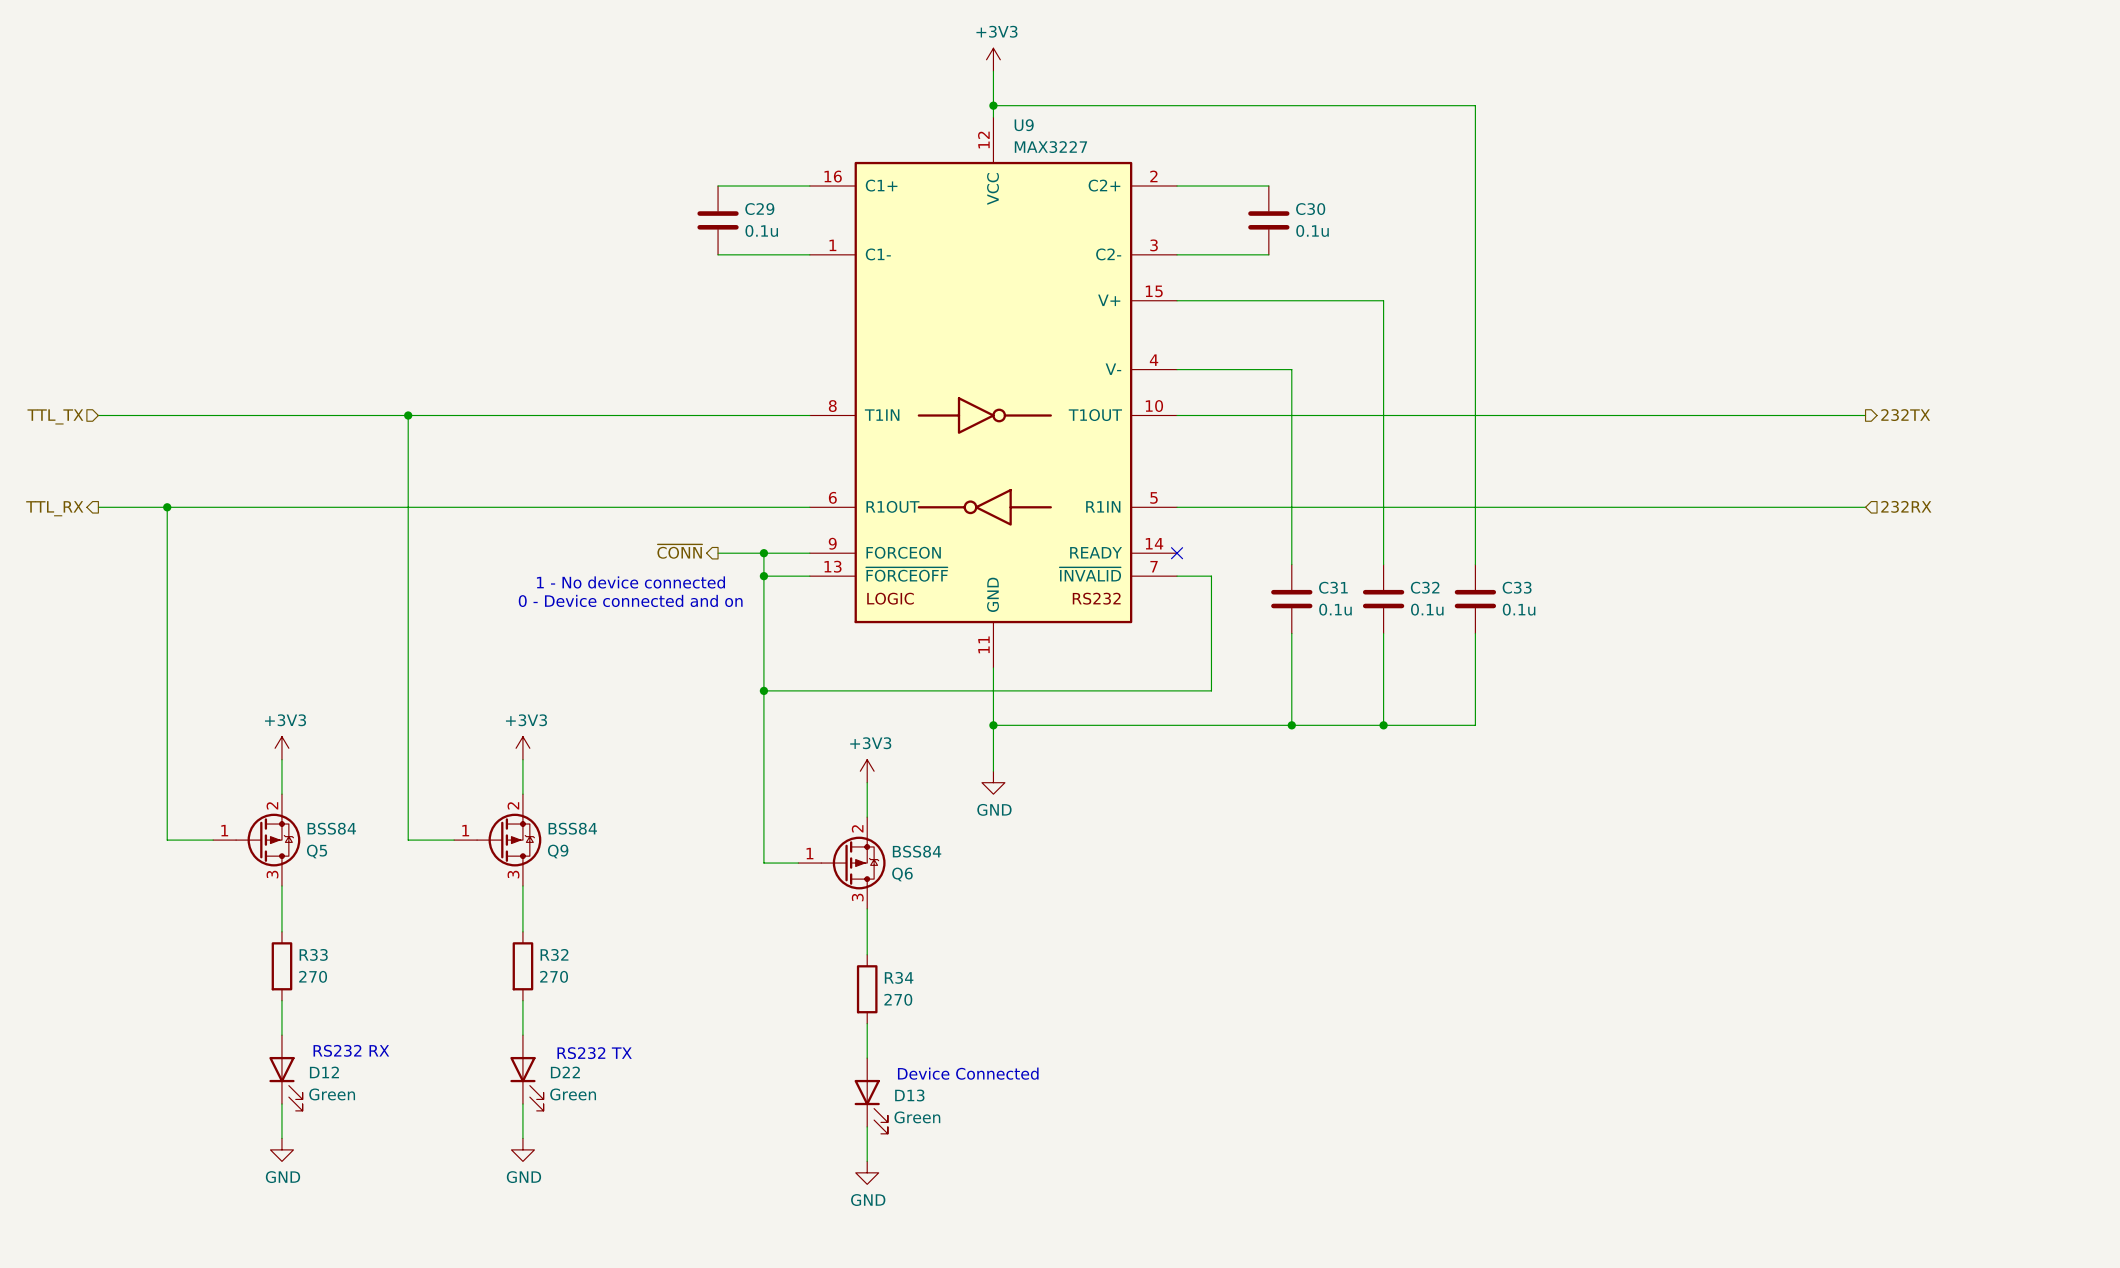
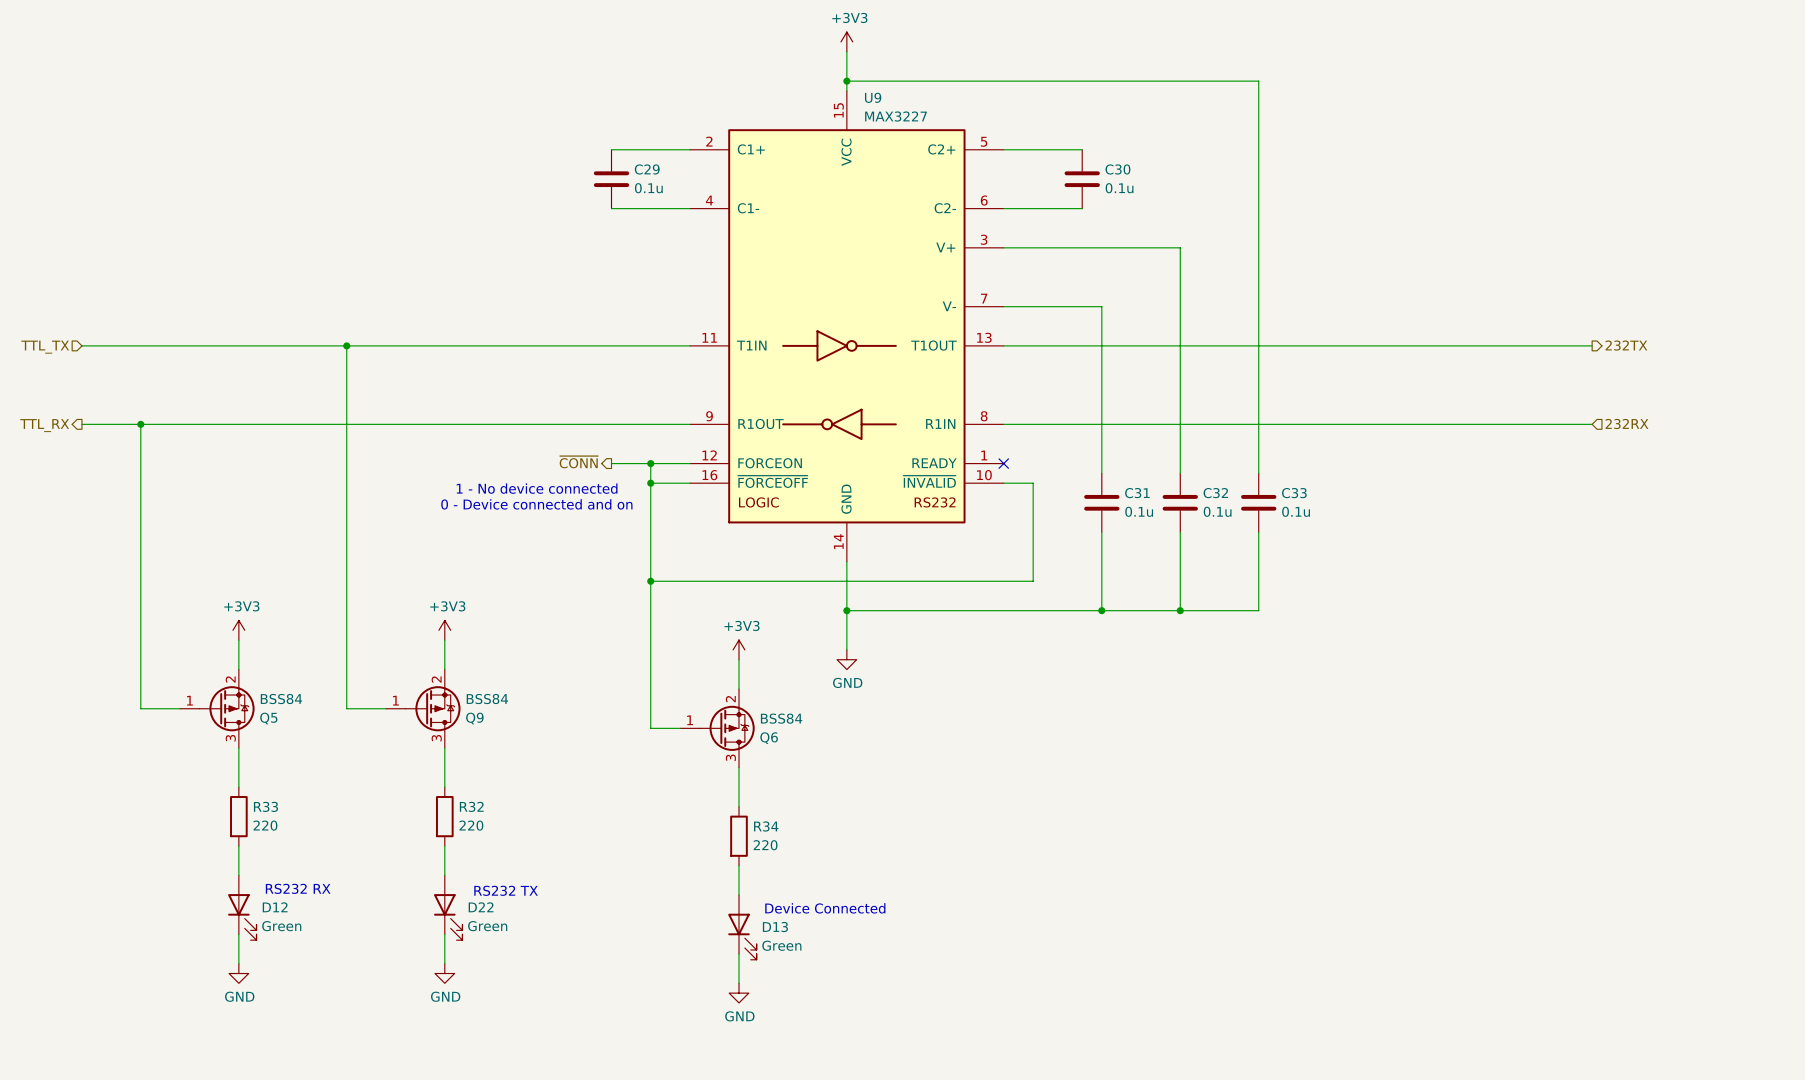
U9 symbol: [809, 117, 1178, 668] -> [689, 90, 1004, 562]
R33 value: 270 (313, 976) -> 220 (265, 825)
R32 value: 270 (554, 976) -> 220 (471, 825)
R34 value: 270 (898, 999) -> 220 (765, 845)

